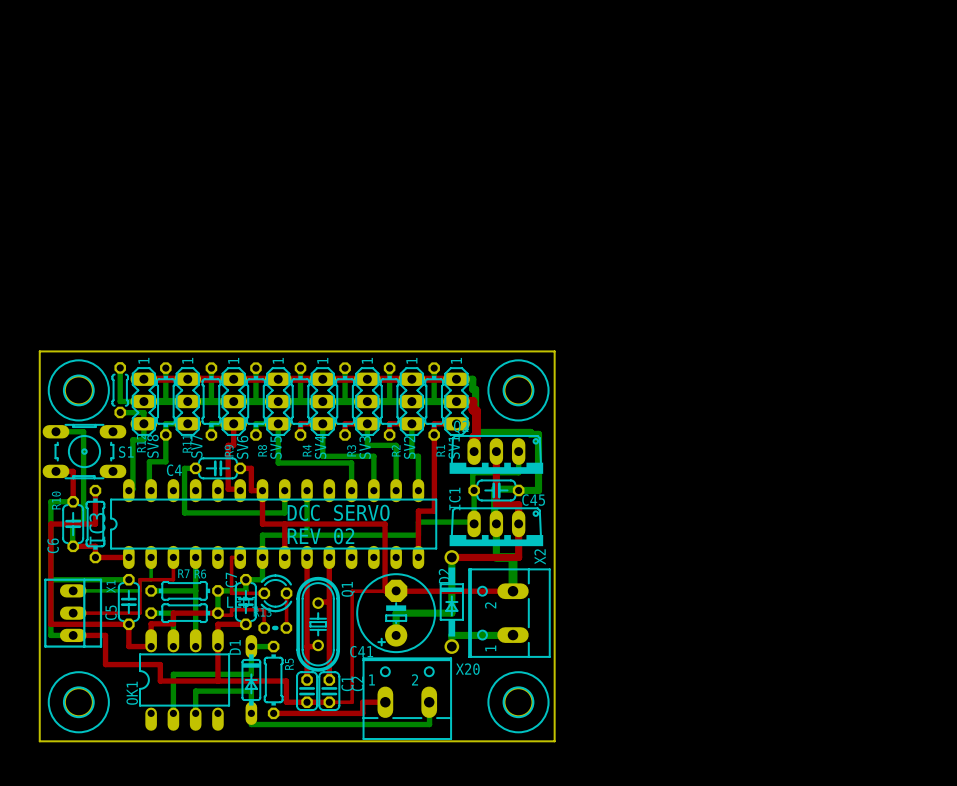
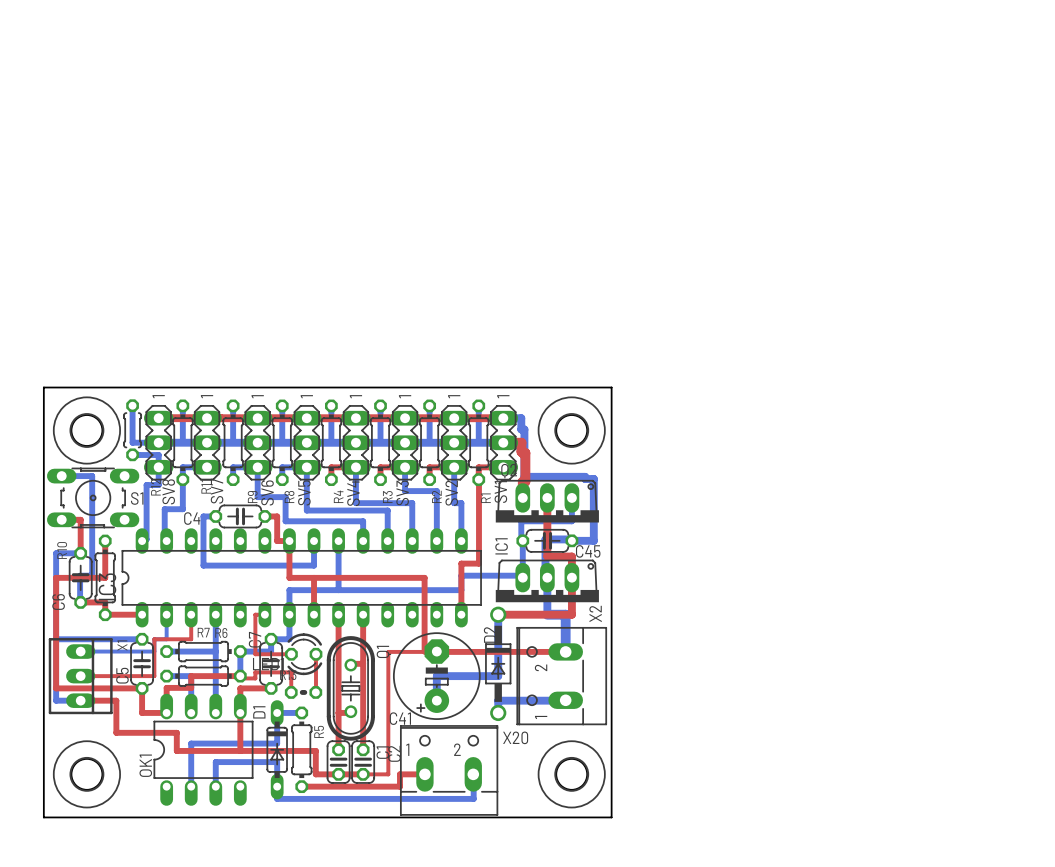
bottom track: none -> (257, 467) (257, 497) (285, 497) (285, 521) (363, 521) (363, 541)
top track: (233, 423) (233, 445) (228, 445) (228, 489) (240, 490) -> none
text: DCC SERVO (338, 512) -> none
text: REV 02 (321, 536) -> none

